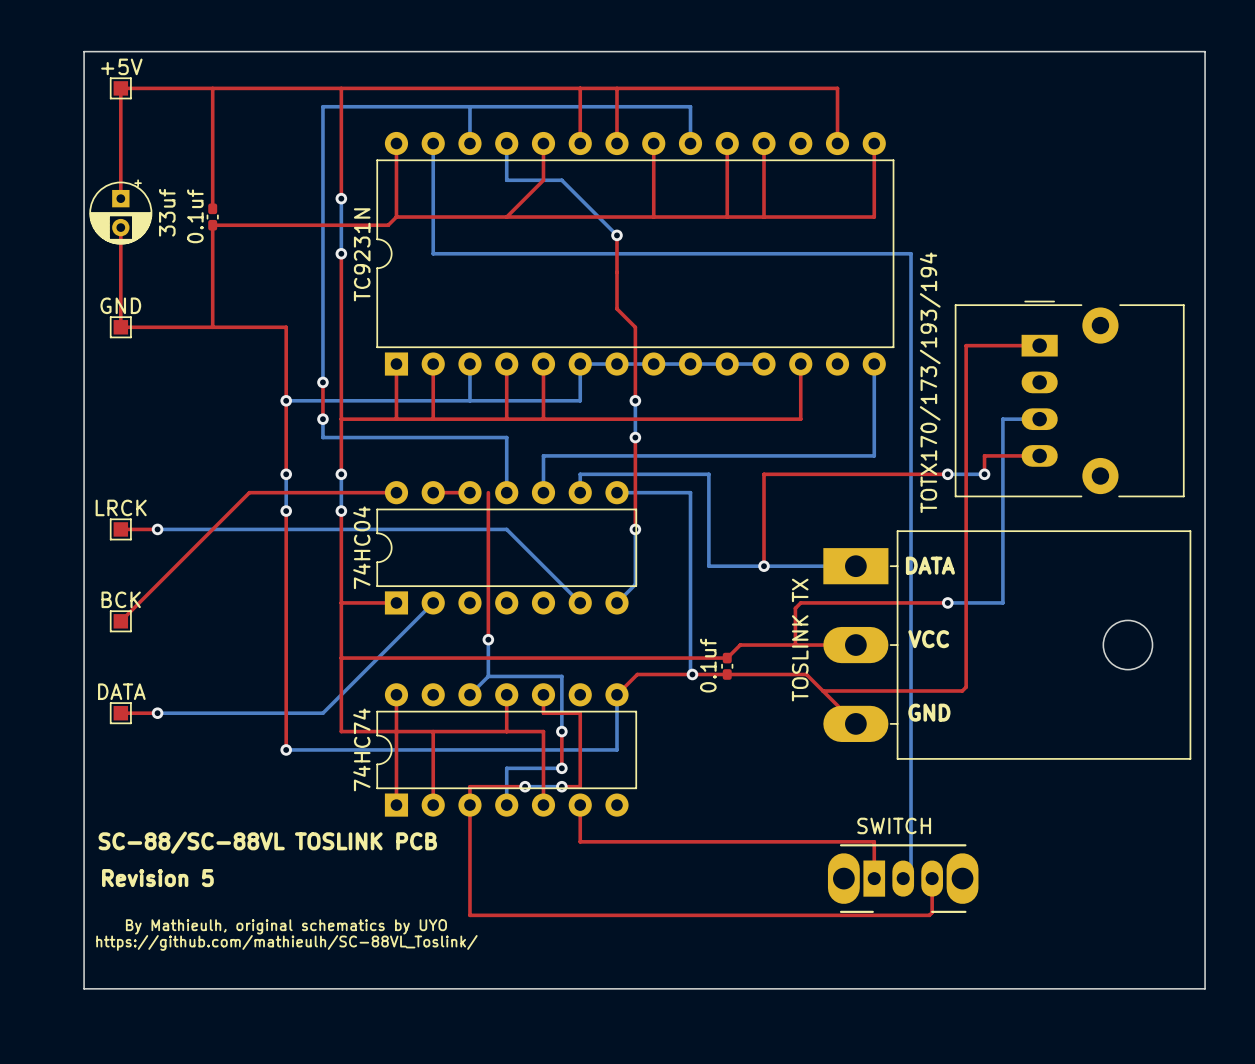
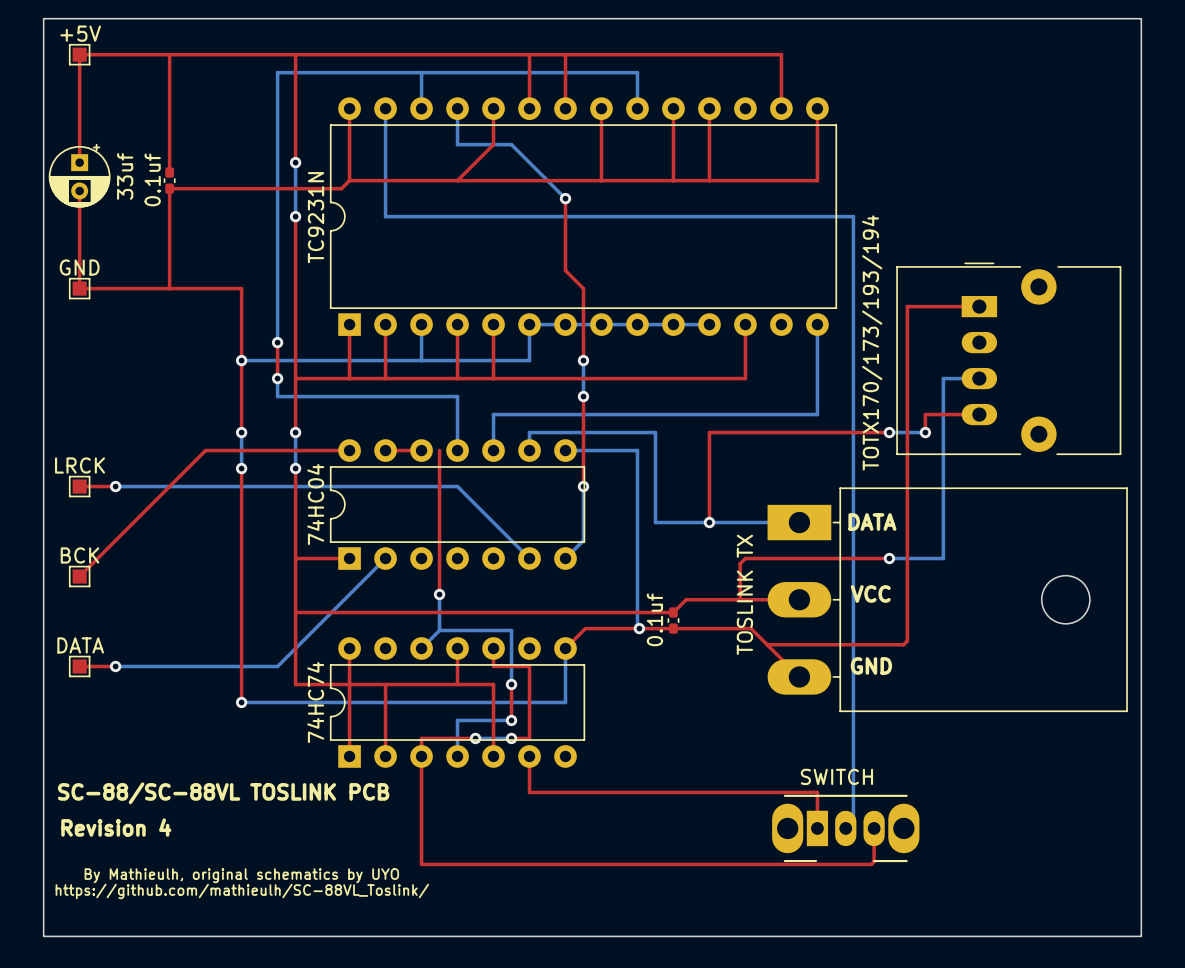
text: Revision 5 (157, 878) -> Revision 4 (116, 827)

